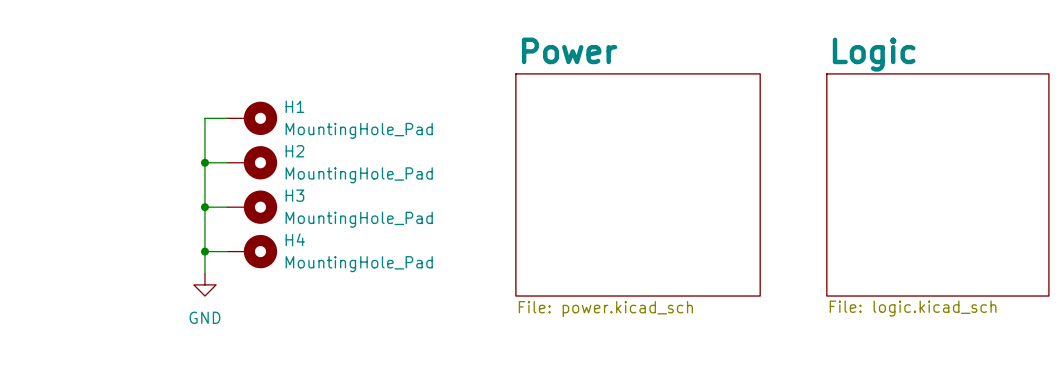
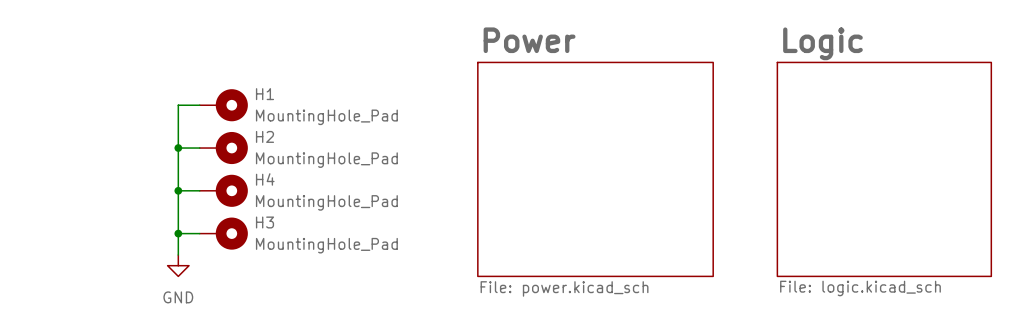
H3 name: H3 (294, 195) -> H4 (265, 179)
H4 name: H4 (295, 239) -> H3 (264, 222)

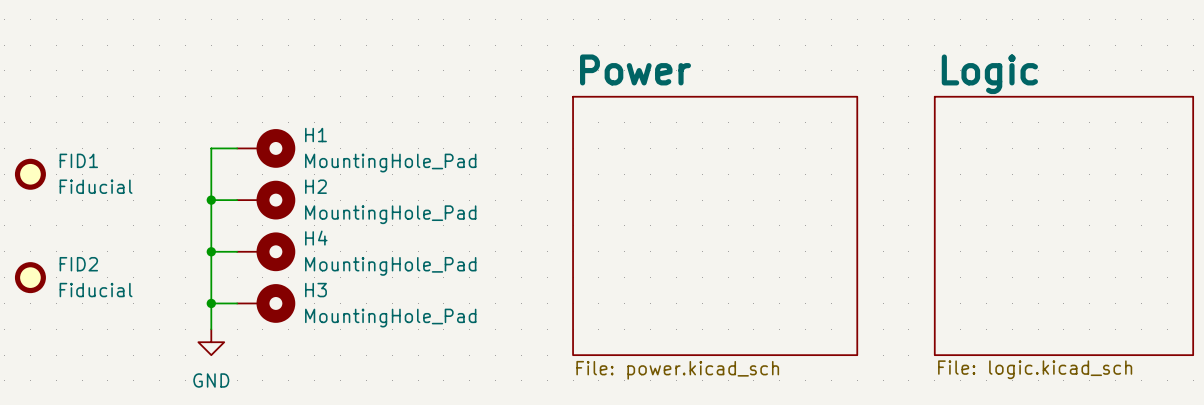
FID1: none -> Fiducial (30, 174)
FID2: none -> Fiducial (30, 277)

